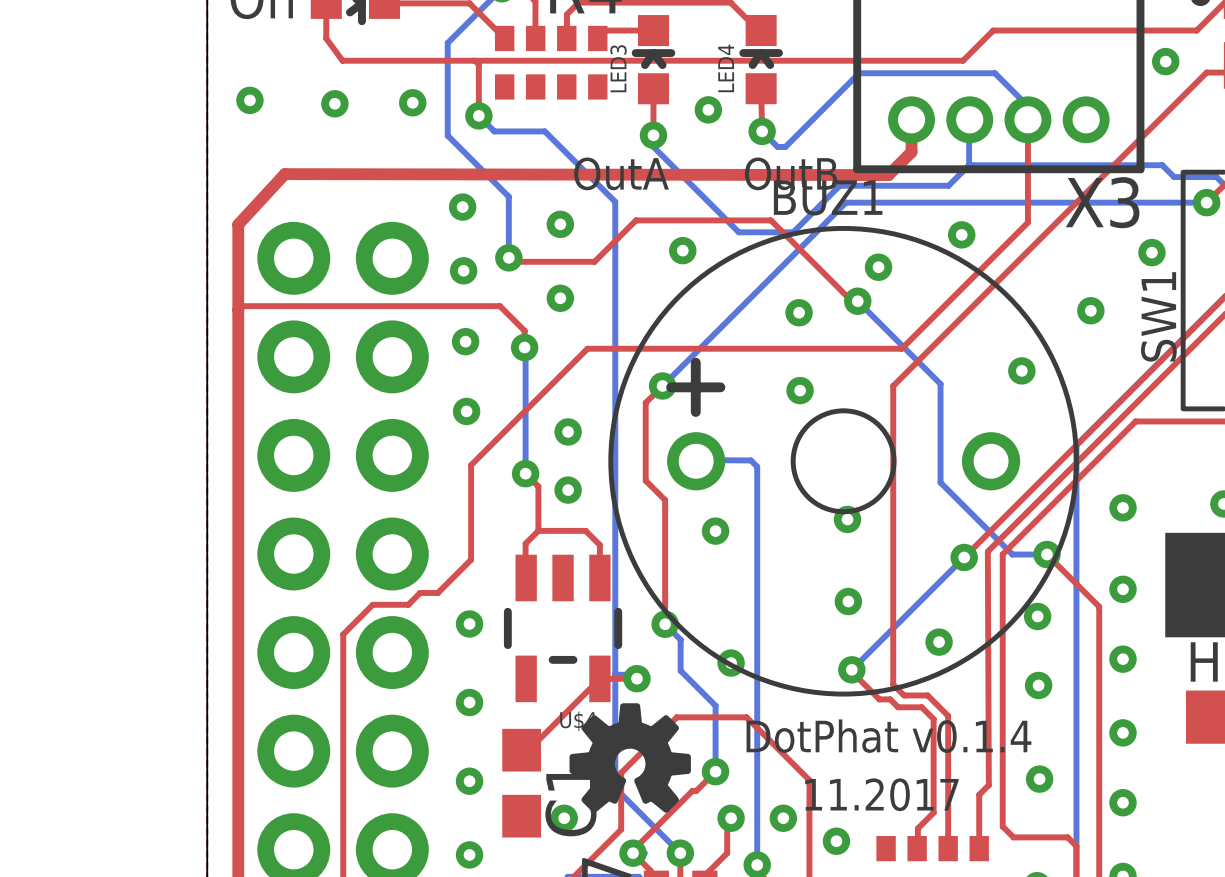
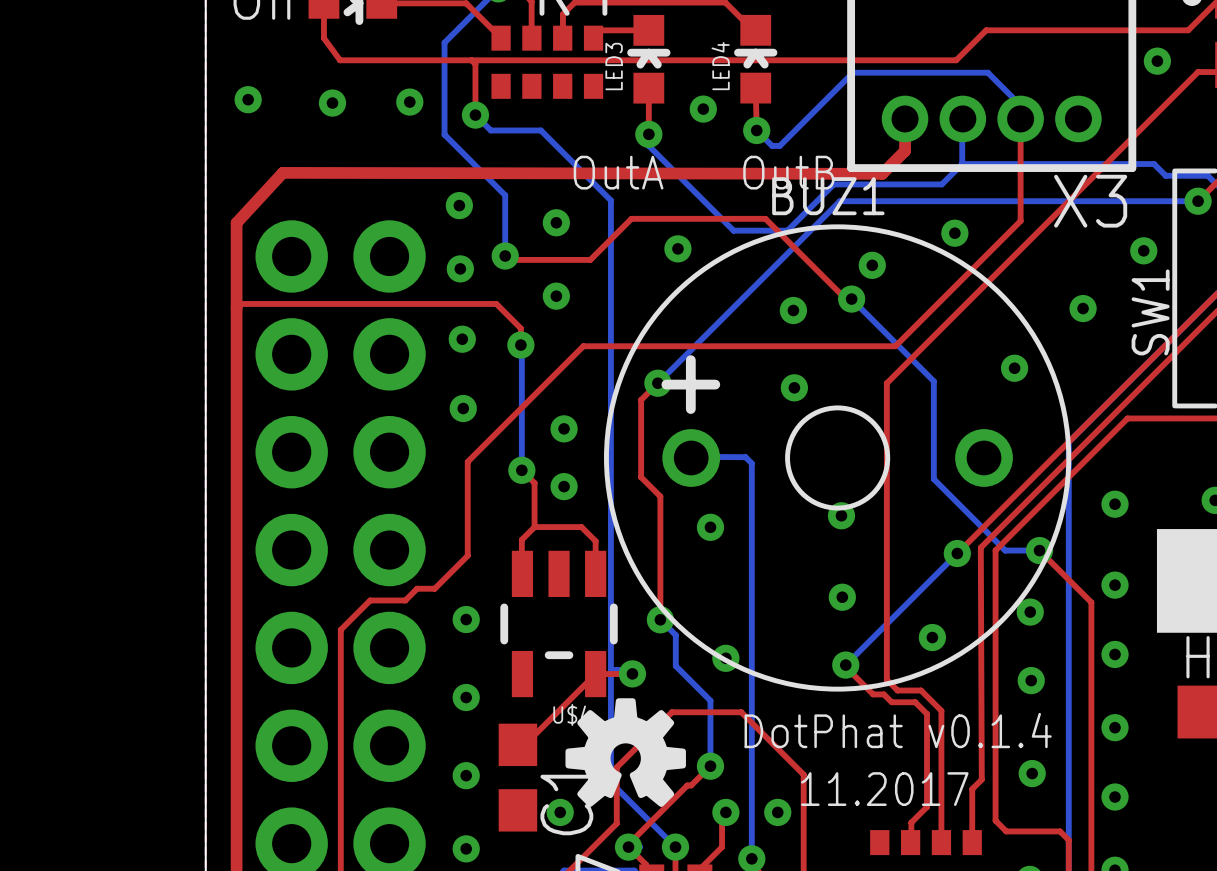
via: (836, 841) -> none

